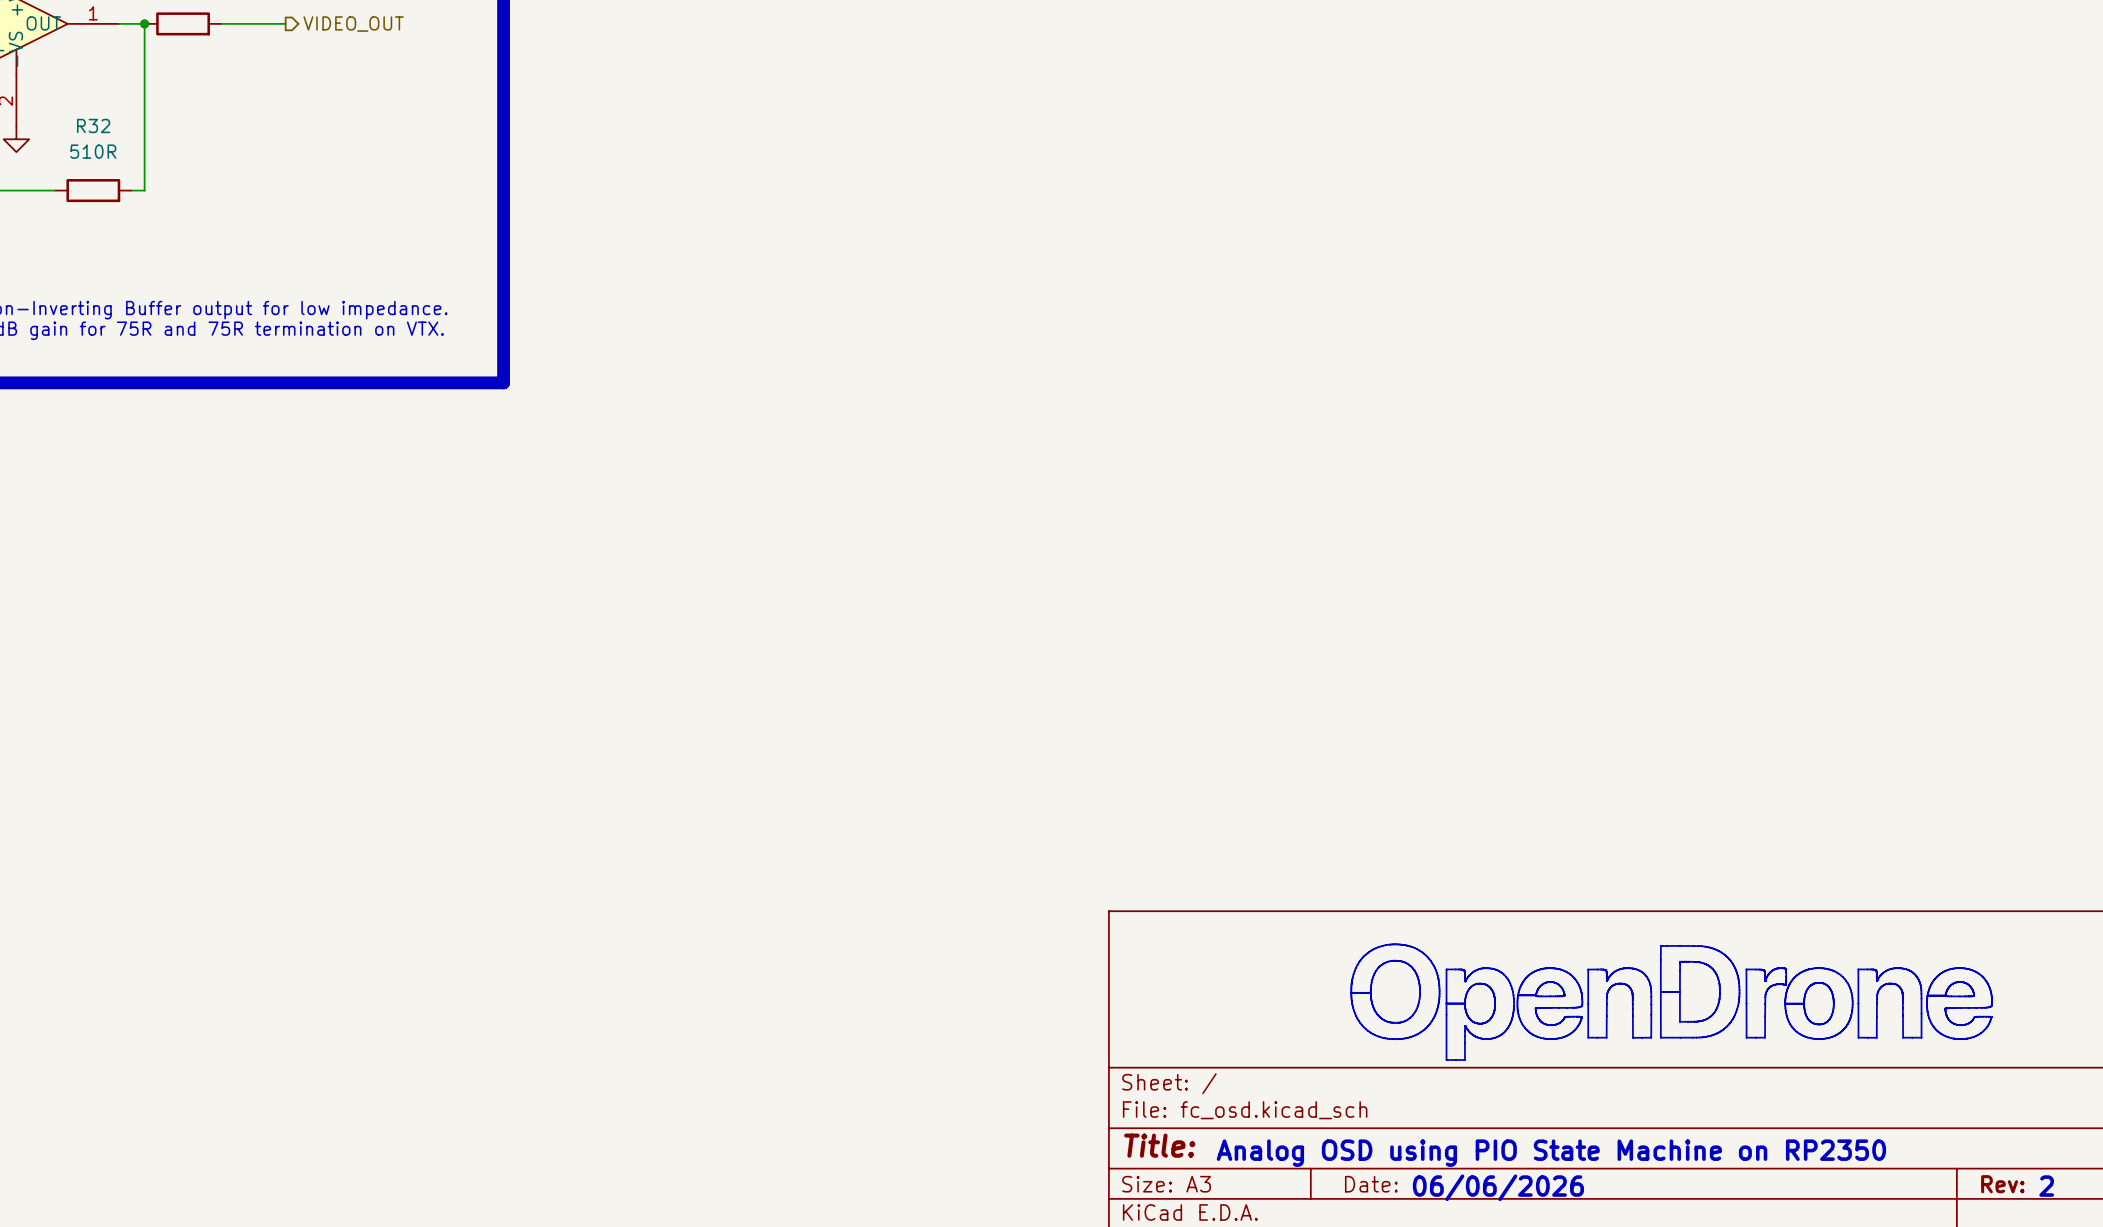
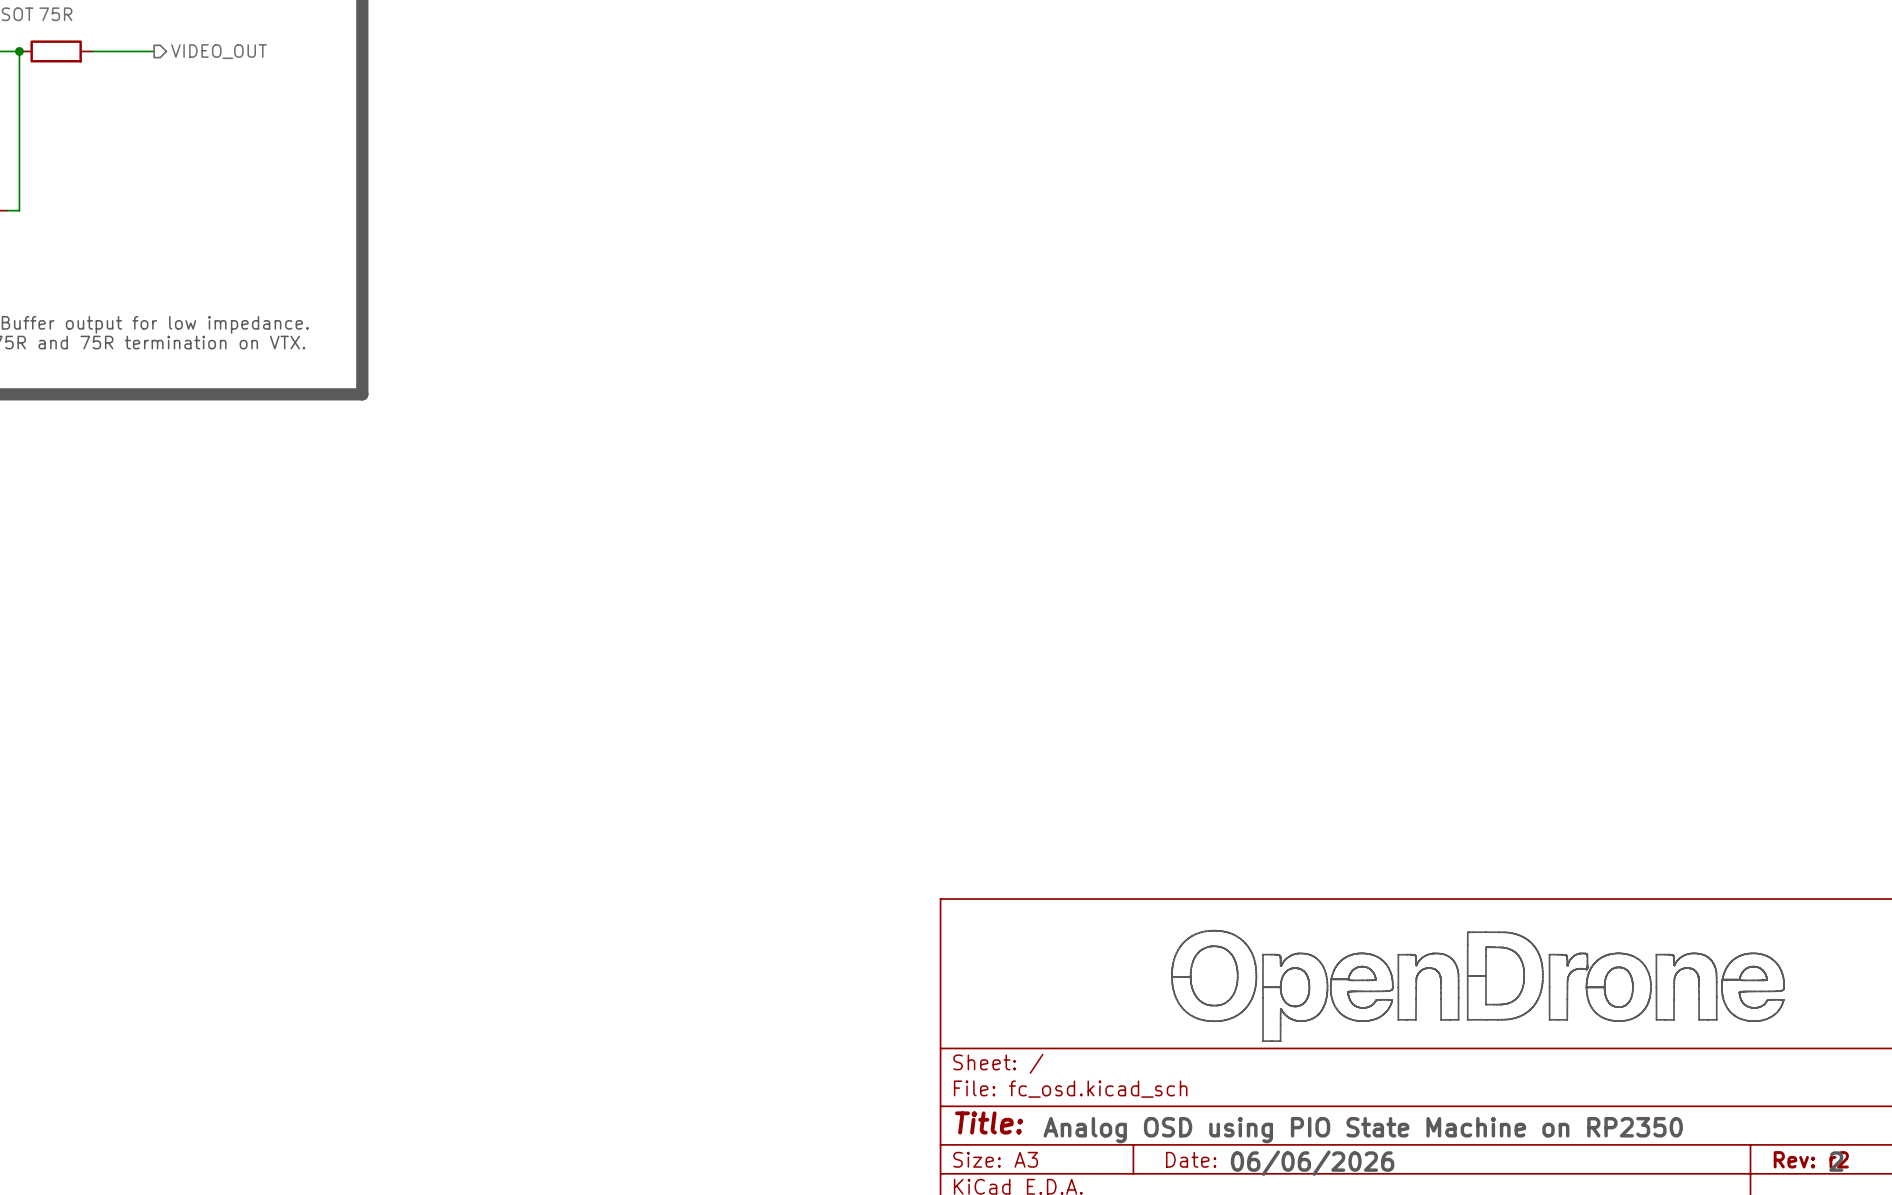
title block: Rev: (2002, 1184) -> Rev: r2 (1811, 1159)

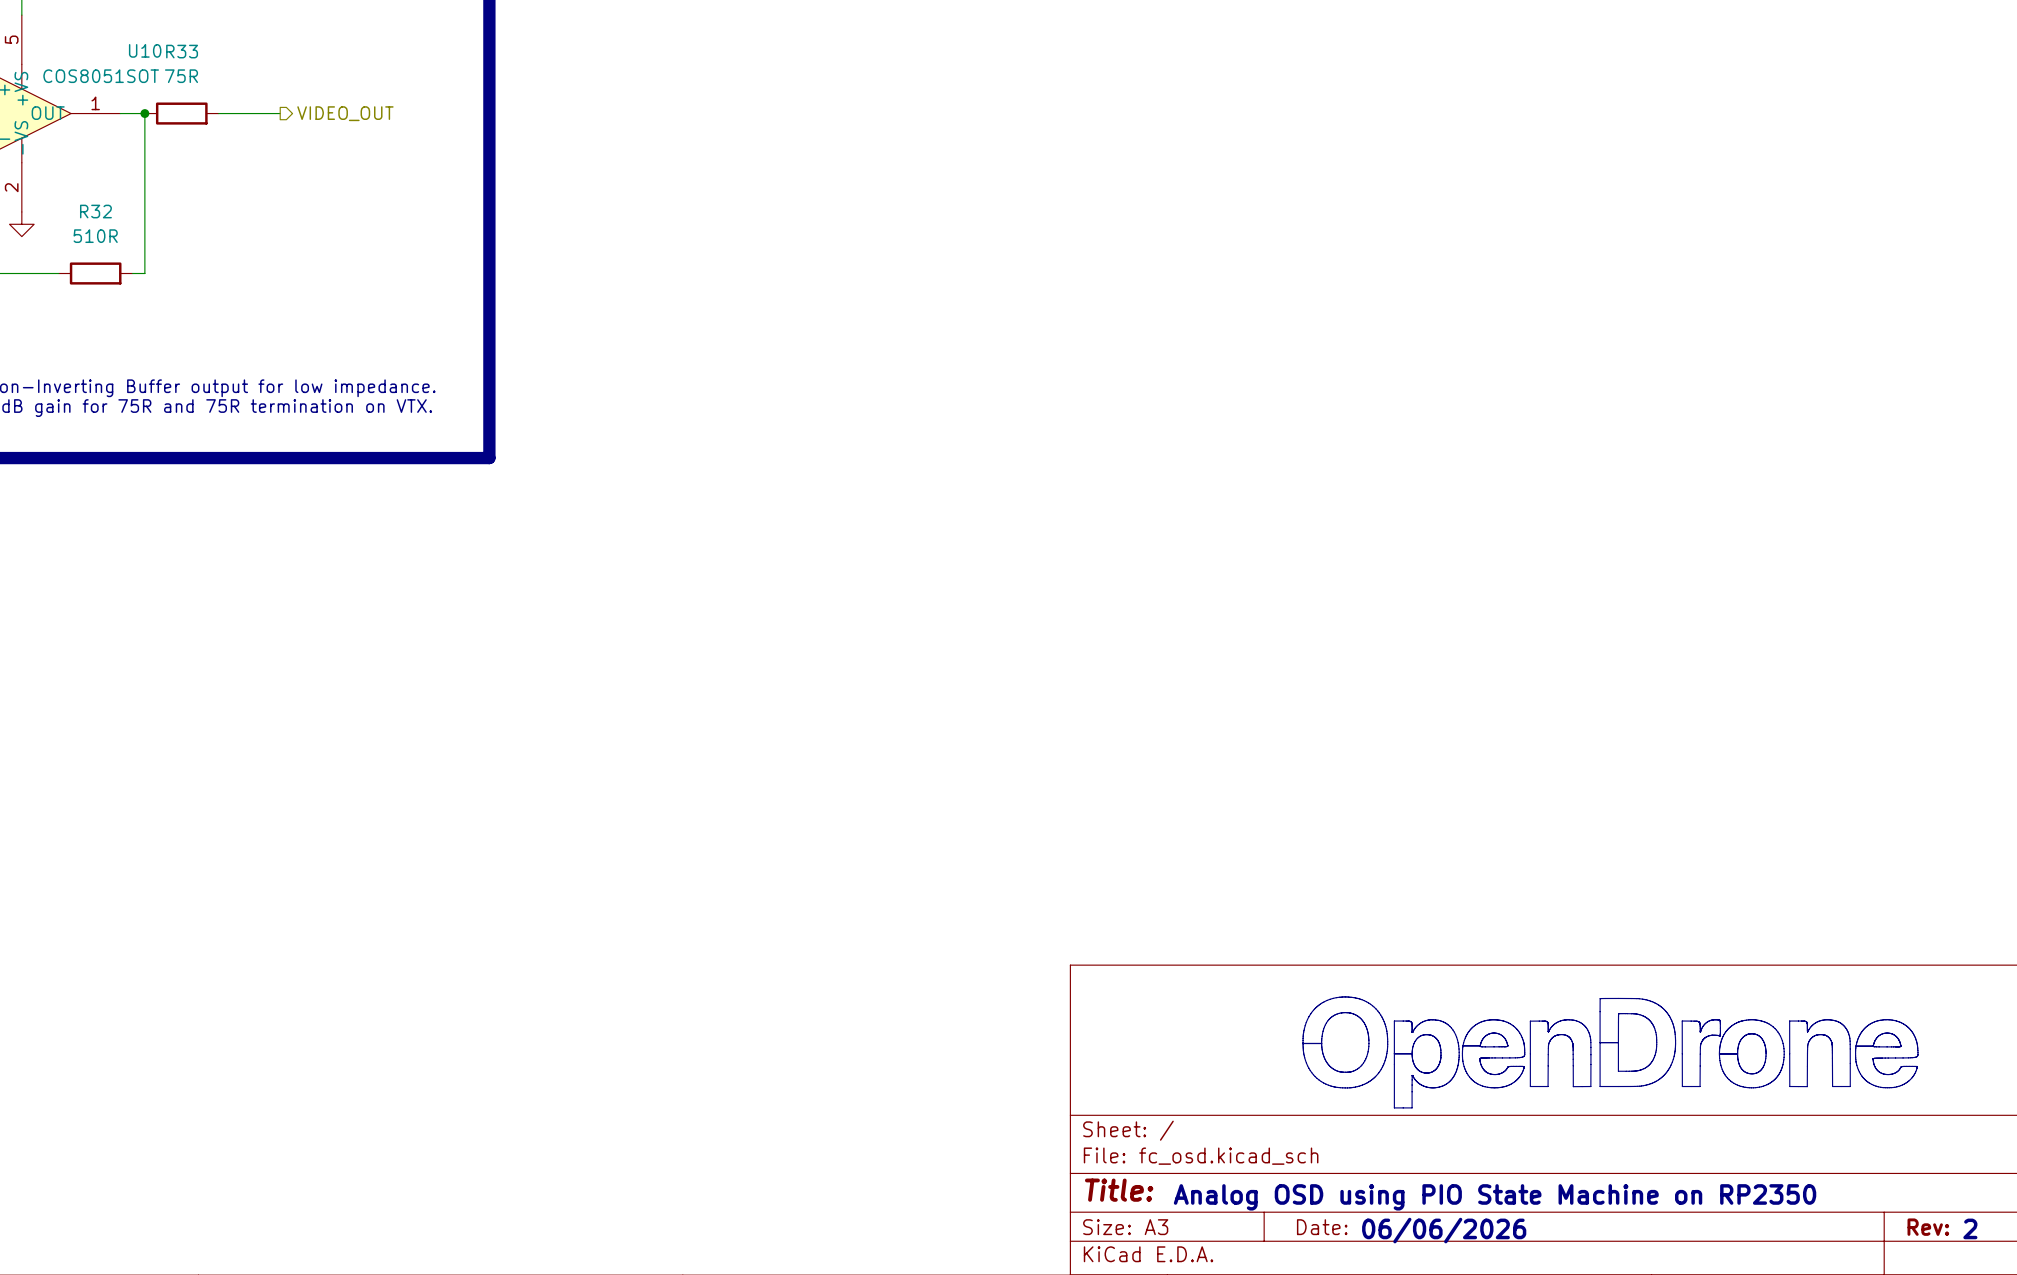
title block: Rev: r2 (1811, 1159) -> Rev: (1928, 1227)

